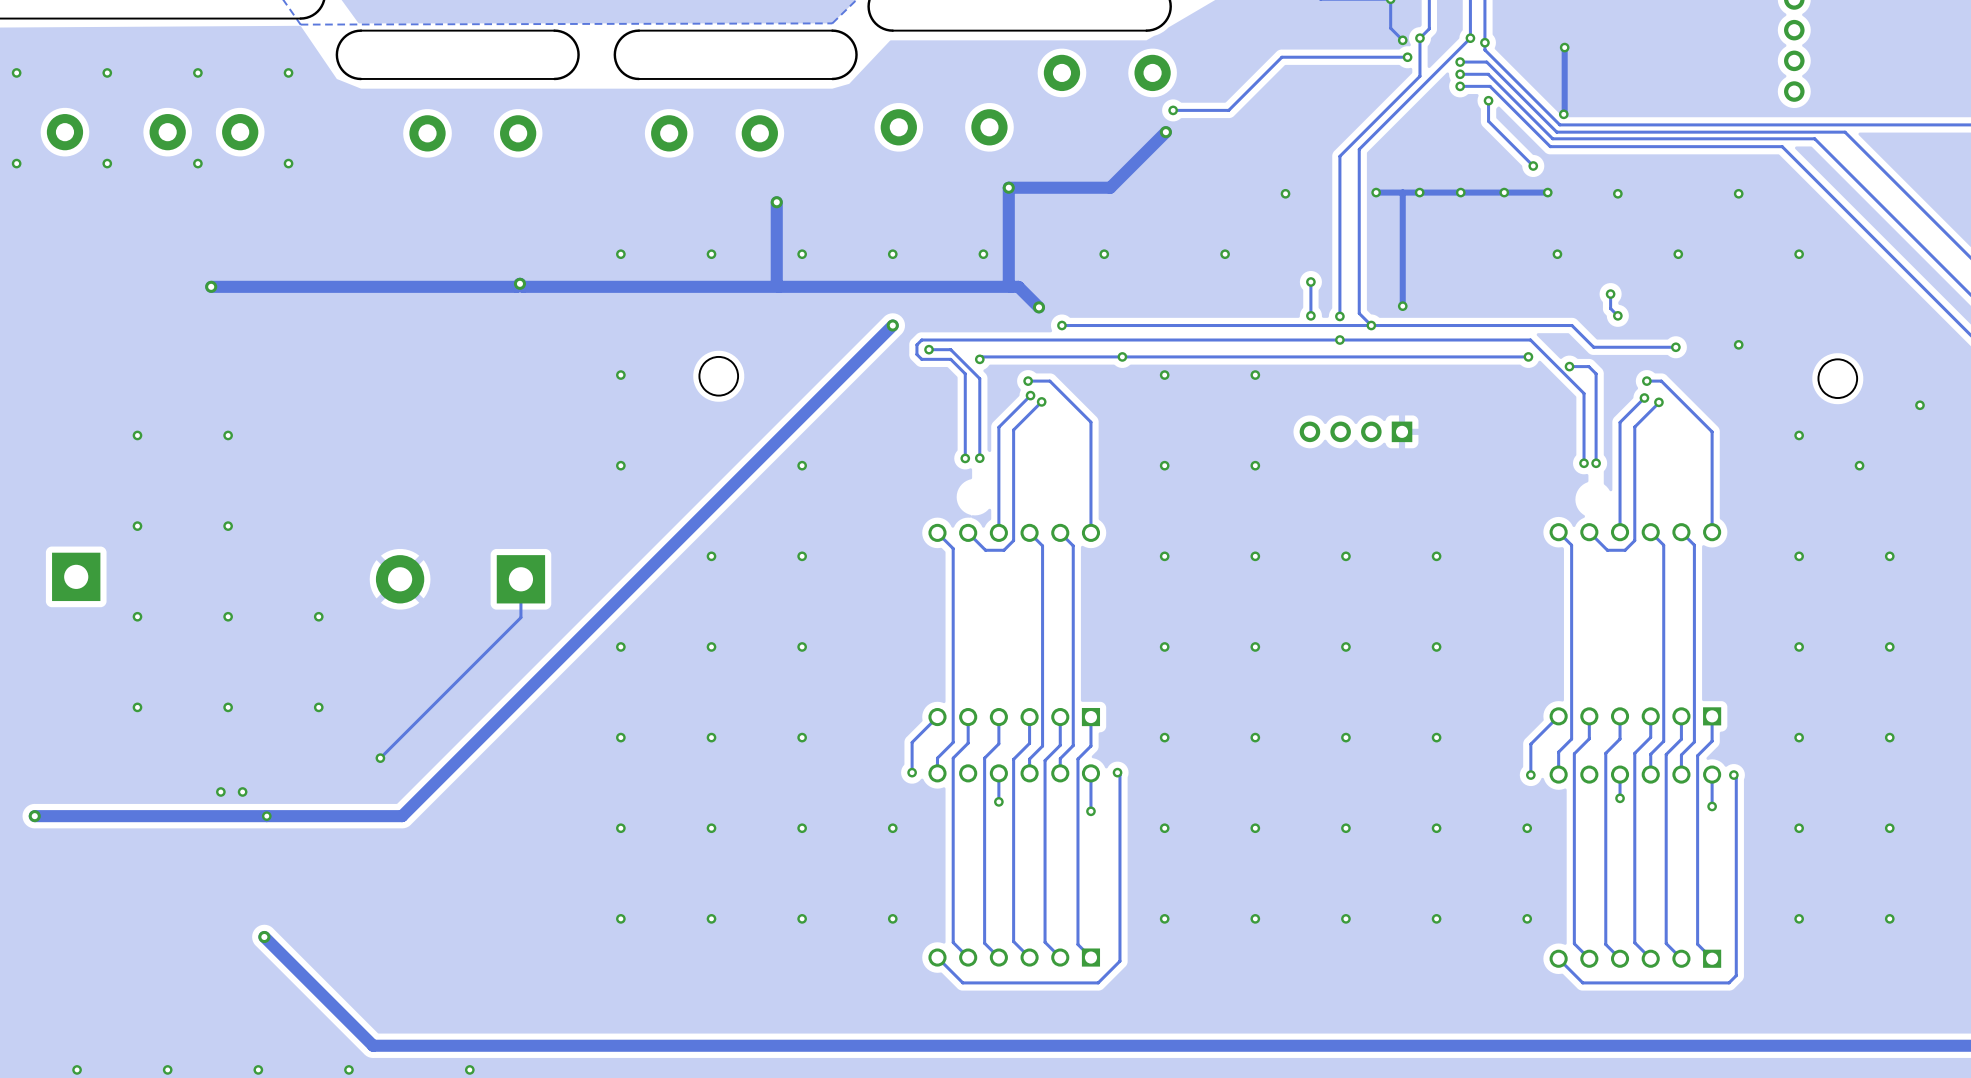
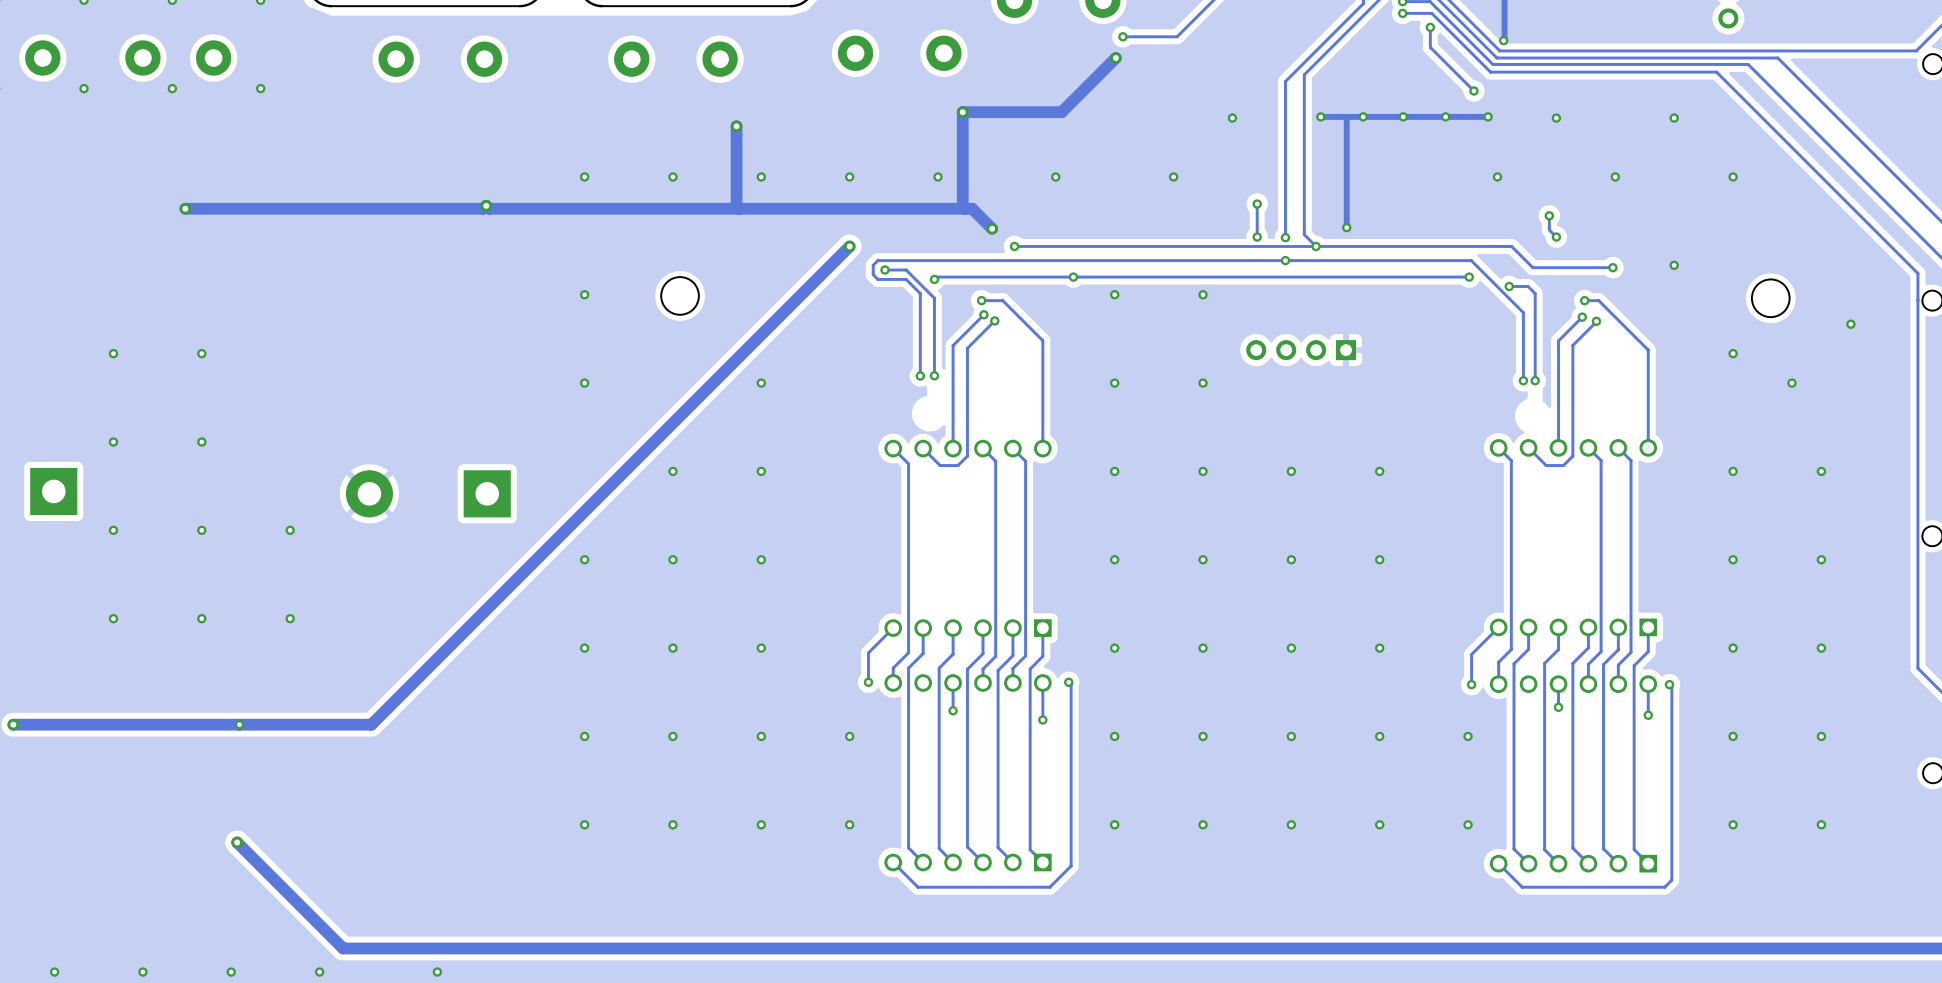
track: (520, 579) (520, 617) (380, 758) -> none
via: (380, 758) -> none
via: (220, 791) -> none
via: (242, 791) -> none

